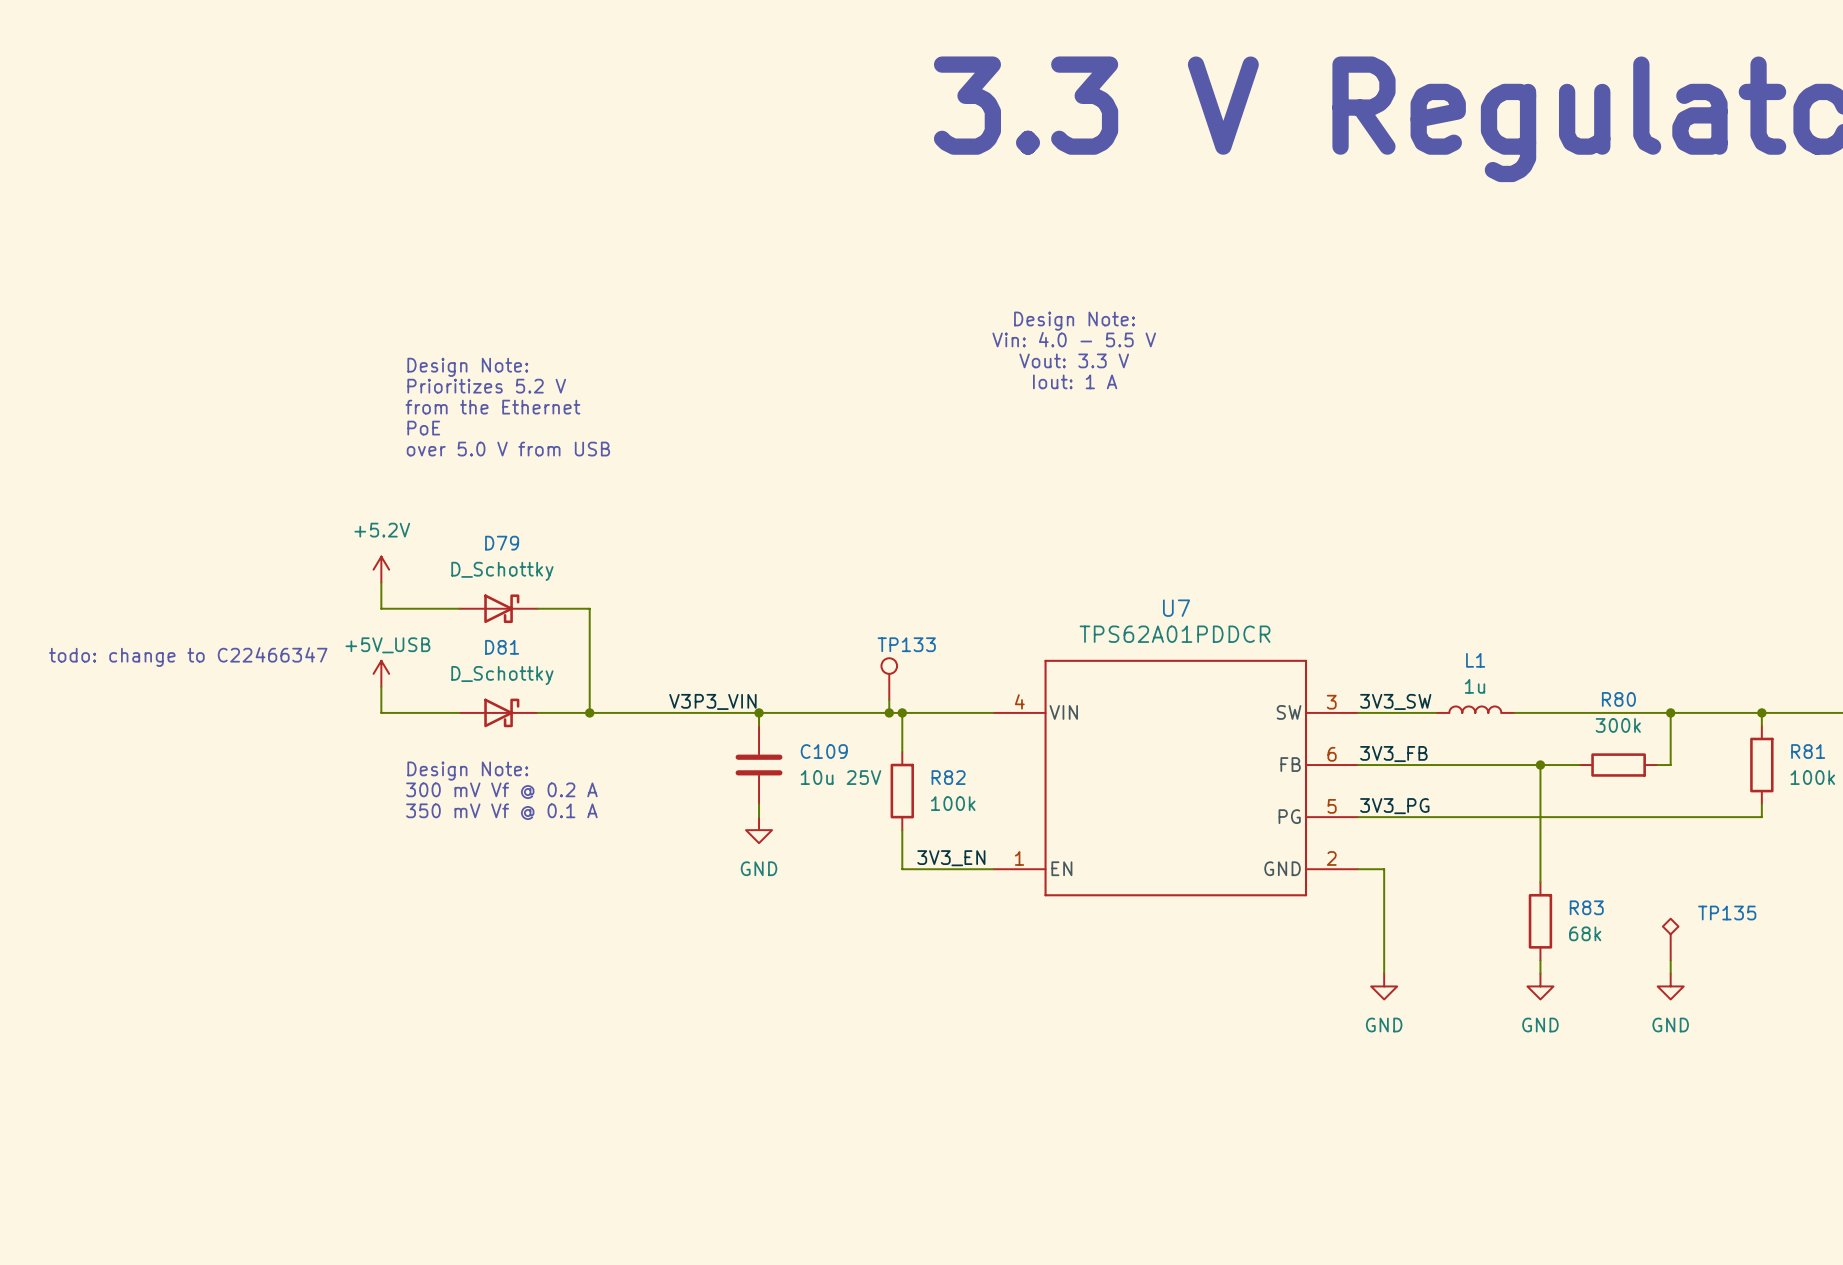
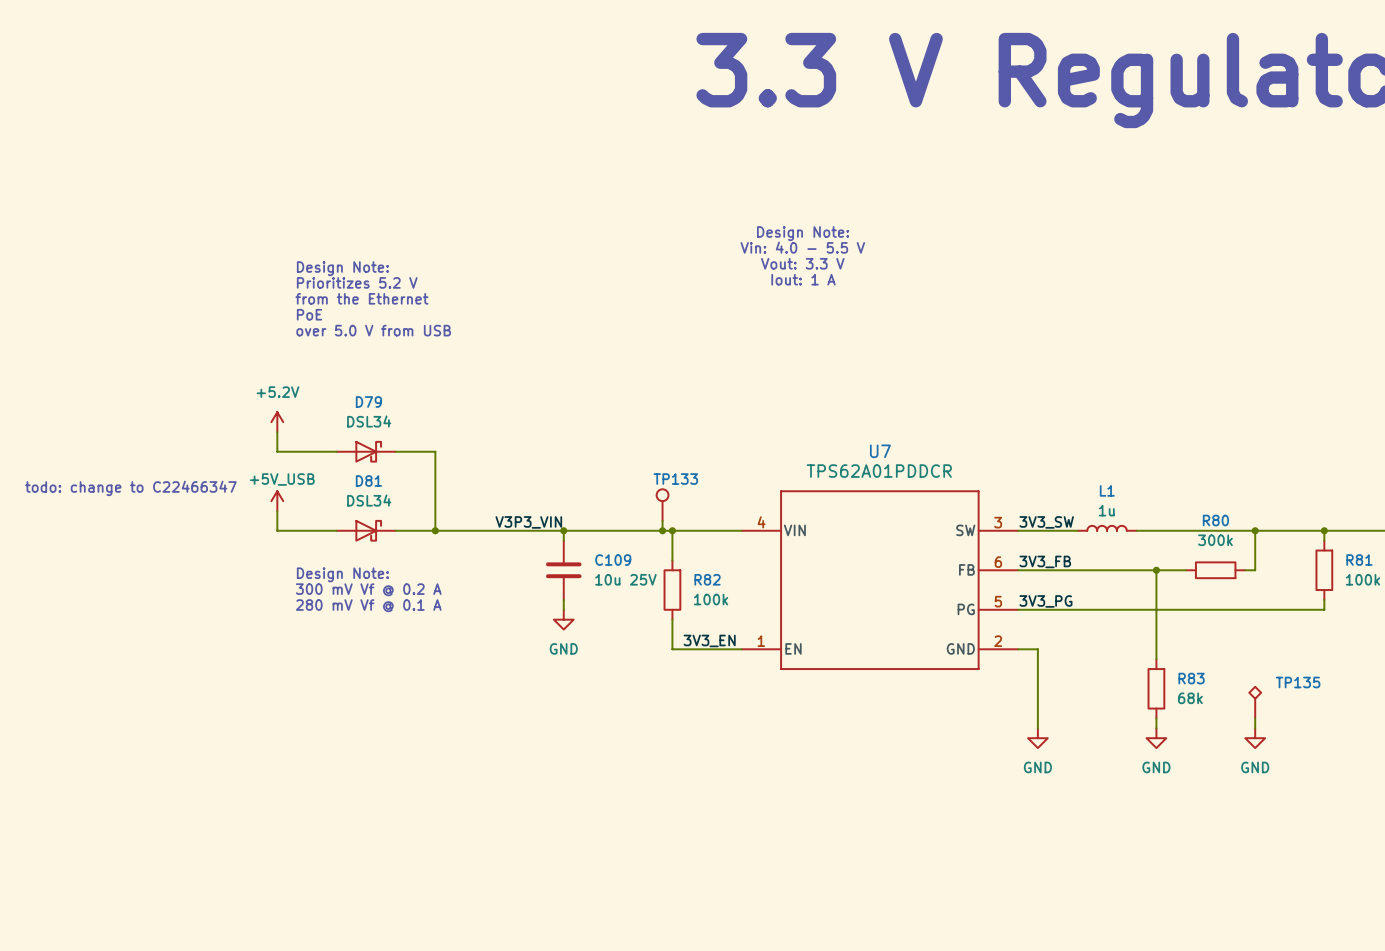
D79 value: D_Schottky (502, 571) -> DSL34 (369, 421)
D81 value: D_Schottky (502, 675) -> DSL34 (369, 500)
text: 350 mV Vf @ 0.1 A (501, 811) -> 280 mV Vf @ 0.1 A (368, 605)

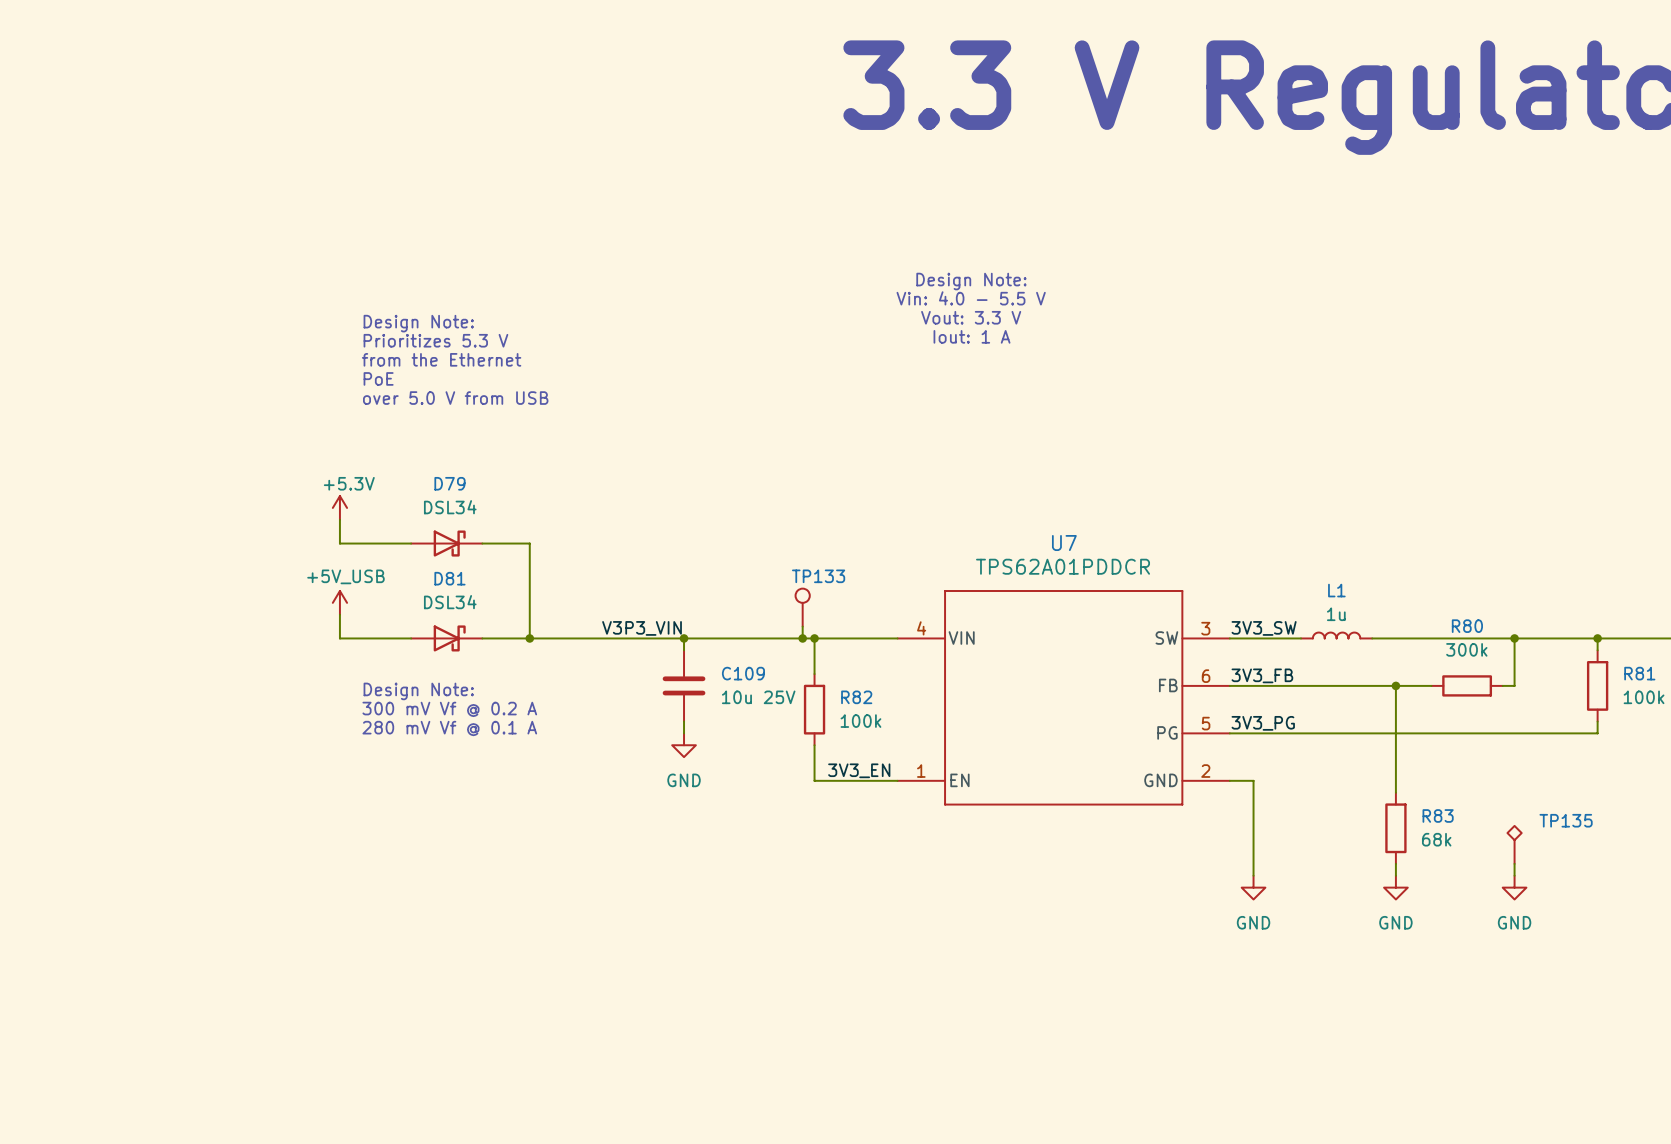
text: Prioritizes 5.2 V (357, 282) -> Prioritizes 5.3 V (435, 340)
power symbol: +5.2V (277, 422) -> +5.3V (339, 507)
text: todo: change to C22466347 (130, 488) -> none

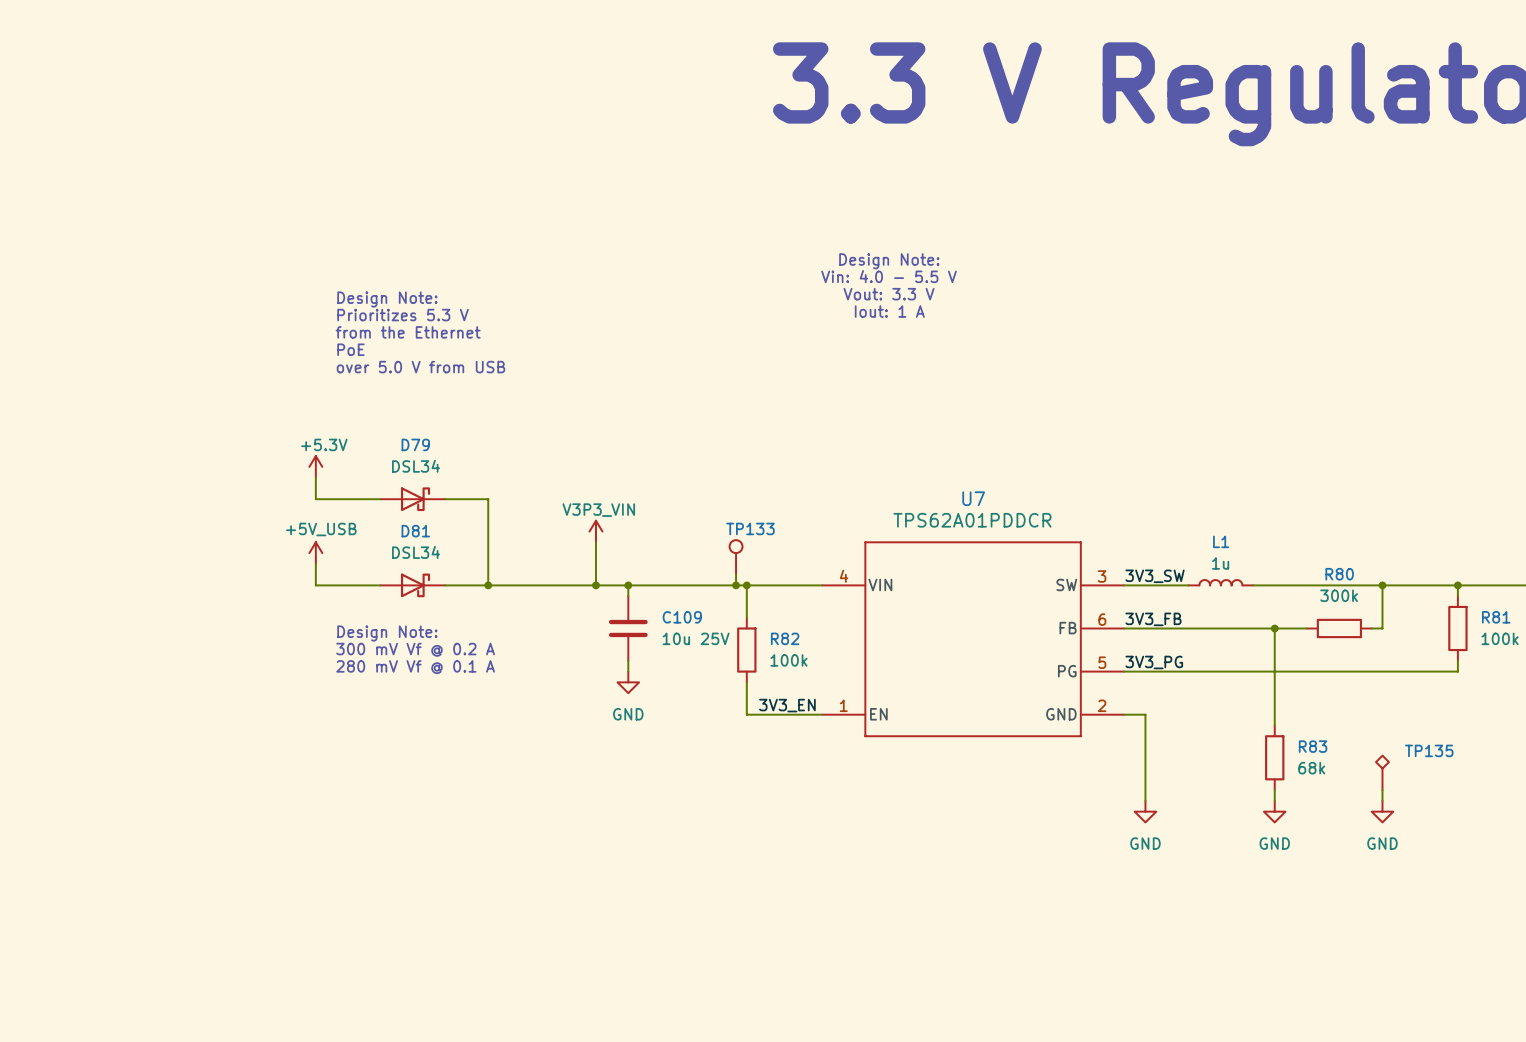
power symbol: none -> V3P3_VIN (595, 531)
wire: none -> (595, 542) (595, 585)
label: V3P3_VIN (642, 628) -> none
junction: none -> (595, 585)

